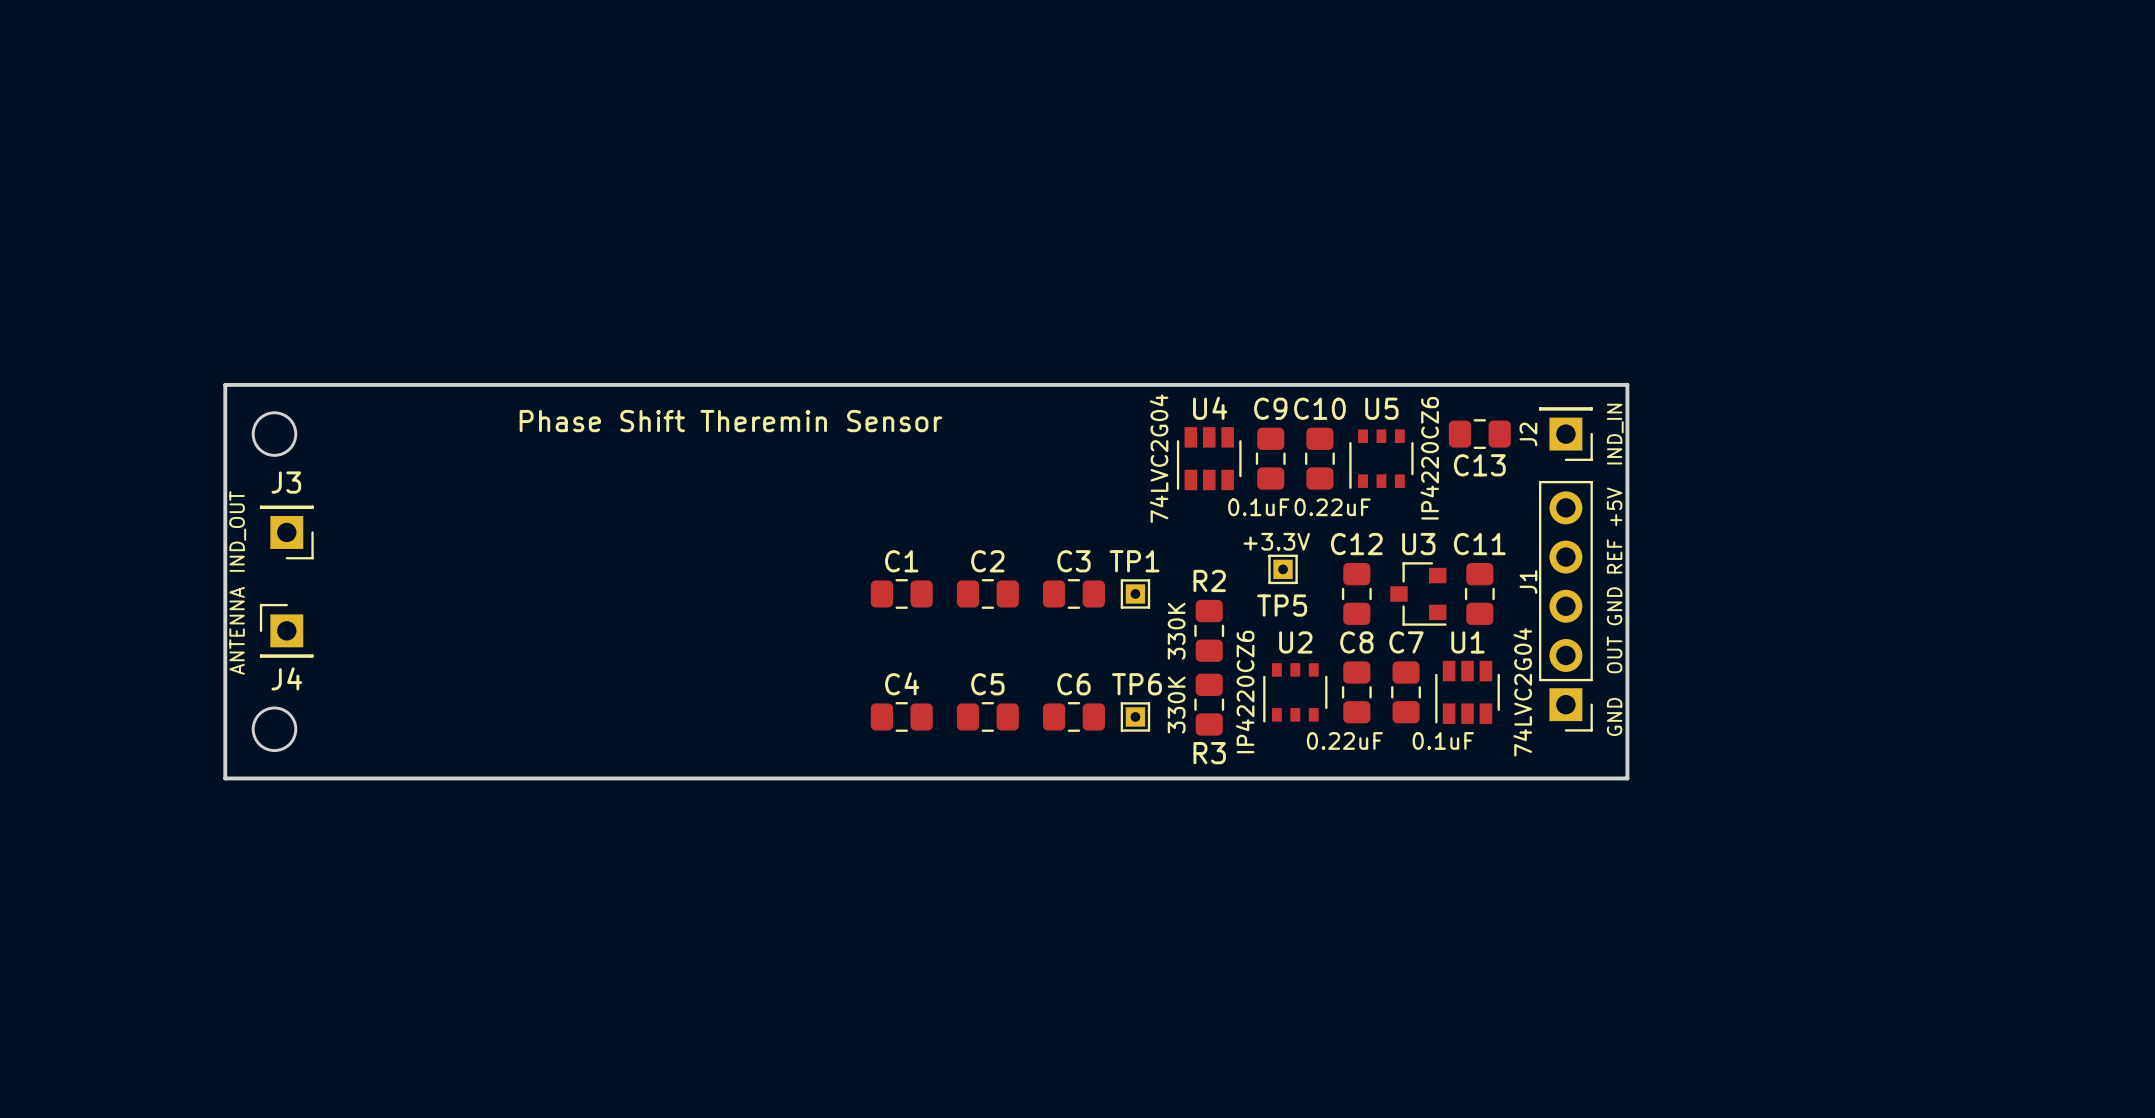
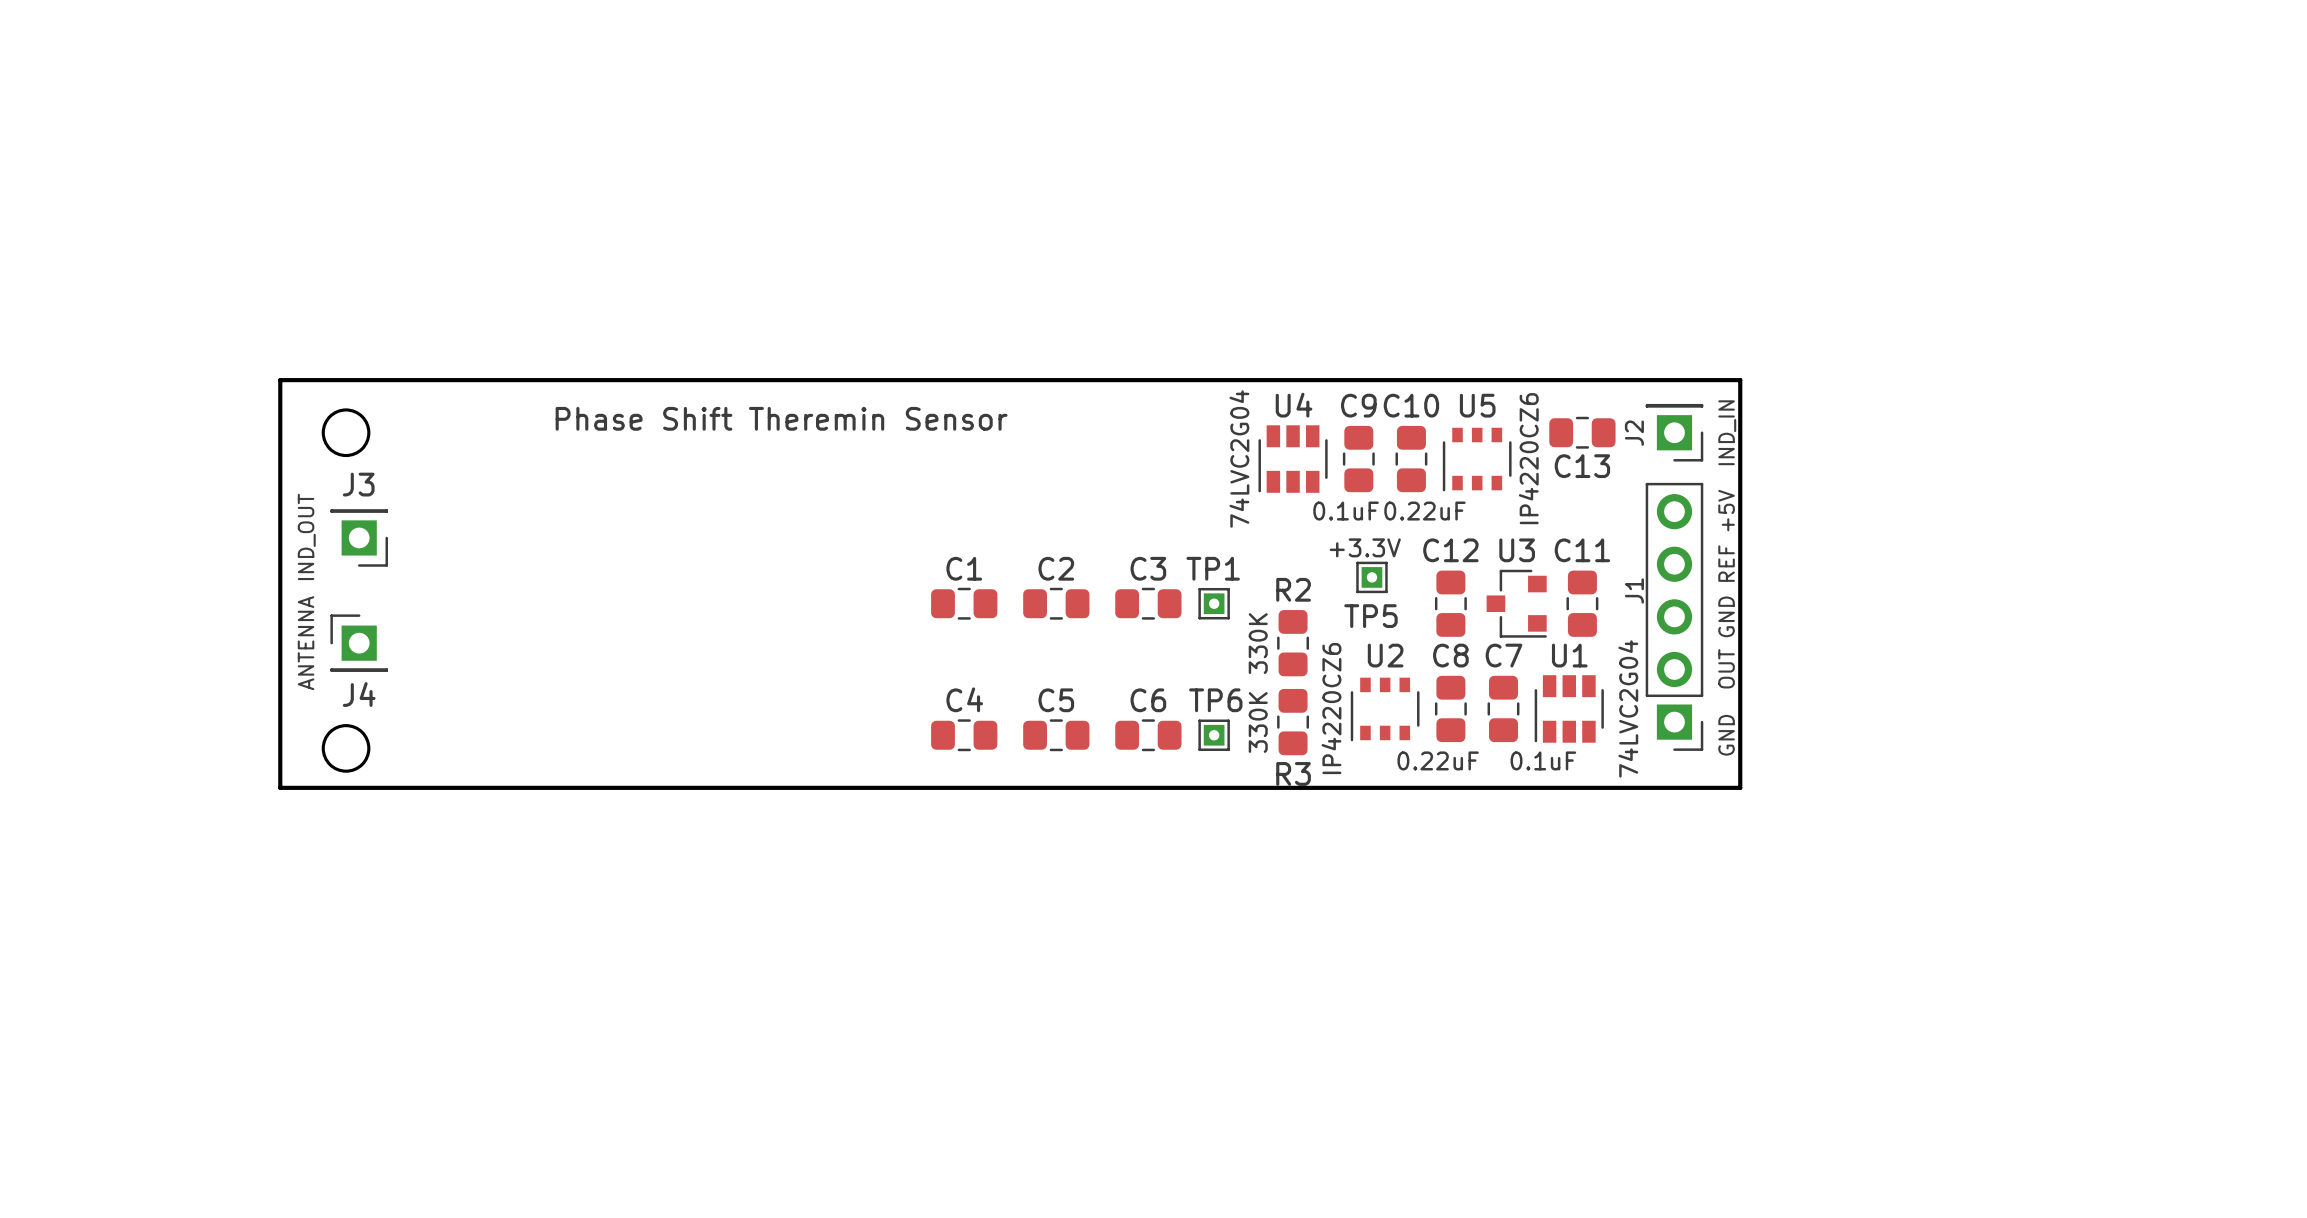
board edge: (262, 384) (225, 384) (225, 778) (1627, 778) (1627, 766) -> (280, 380) (280, 787) (1740, 787)
round board edge position: (274, 434) -> (346, 432)
text position: IND_OUT (237, 531) -> IND_OUT (306, 536)
J3 position: (286, 532) -> (359, 537)
text position: ANTENNA (237, 630) -> ANTENNA (306, 643)
J4 position: (286, 630) -> (359, 643)
round board edge position: (274, 729) -> (346, 748)

